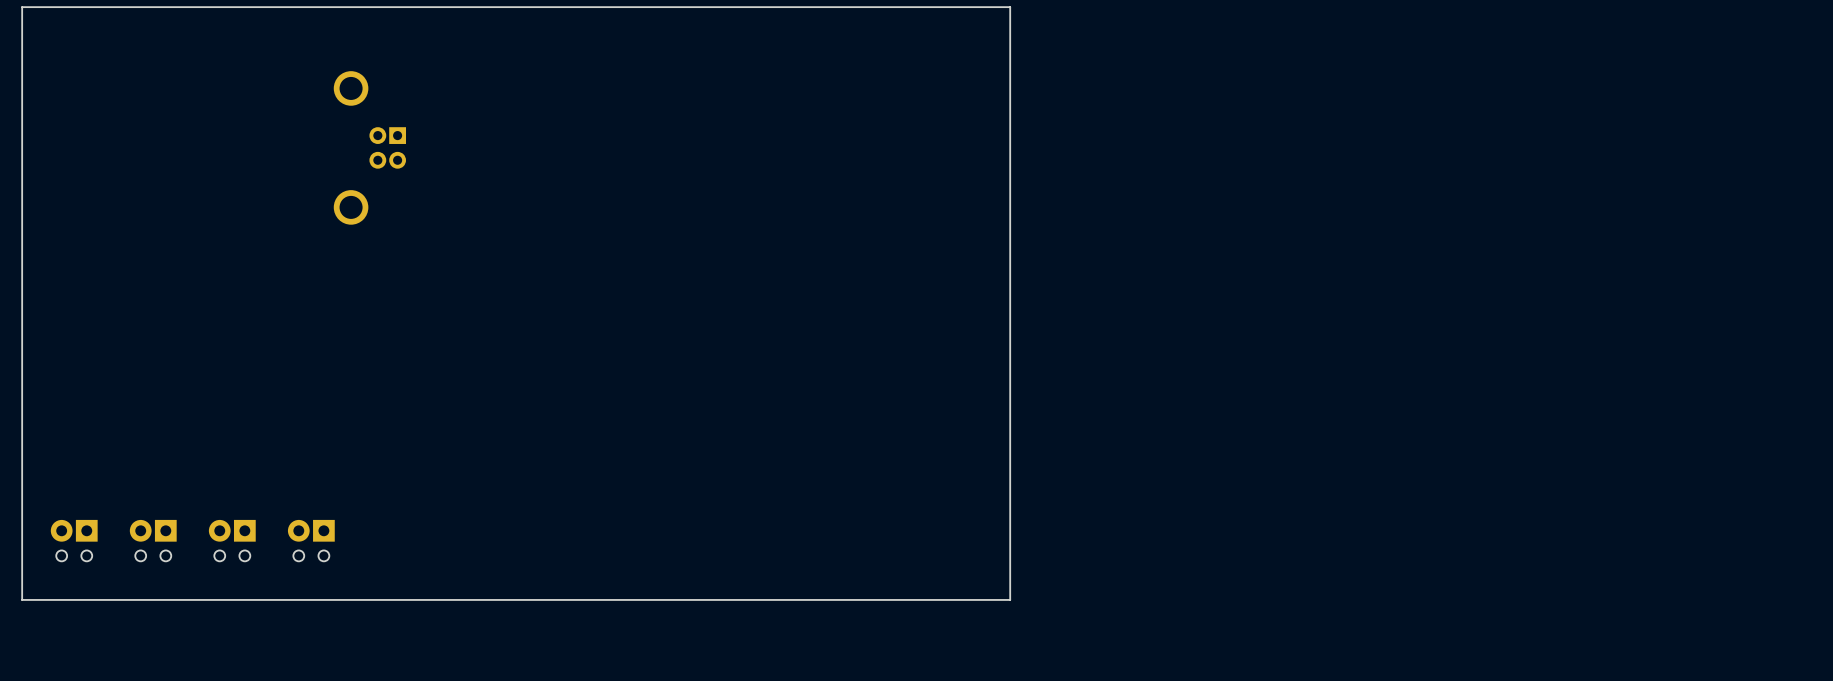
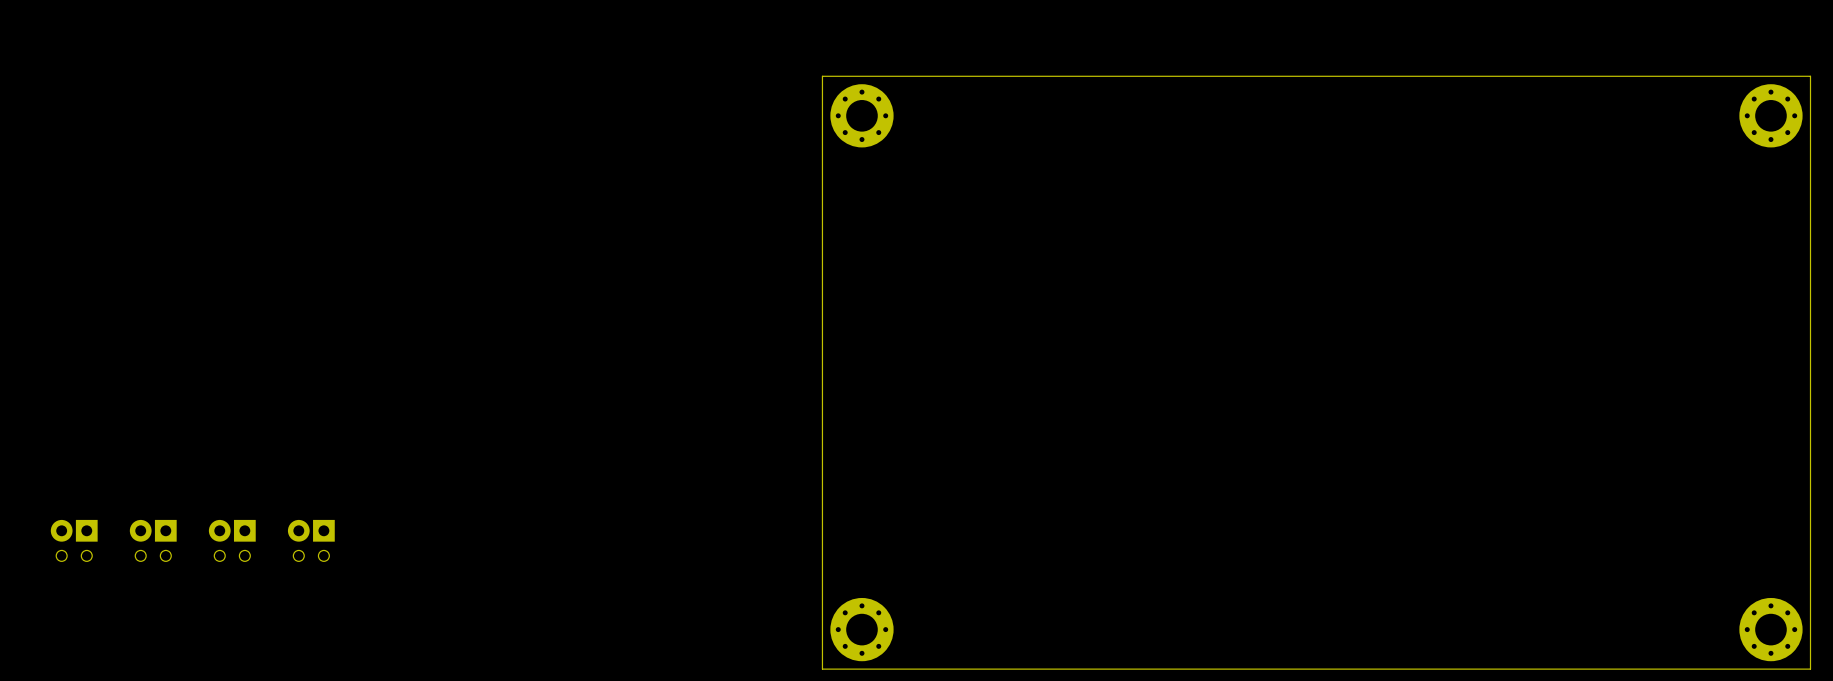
board edge: (1010, 7) (1010, 599) (22, 599) (22, 7) (1010, 7) -> none
board edge: none -> (1810, 76) (1810, 669) (822, 669) (822, 76) (1810, 76)
part: none -> (861, 115)
part: none -> (1770, 115)
part: (369, 147) -> none
part: none -> (861, 629)
part: none -> (1770, 629)

